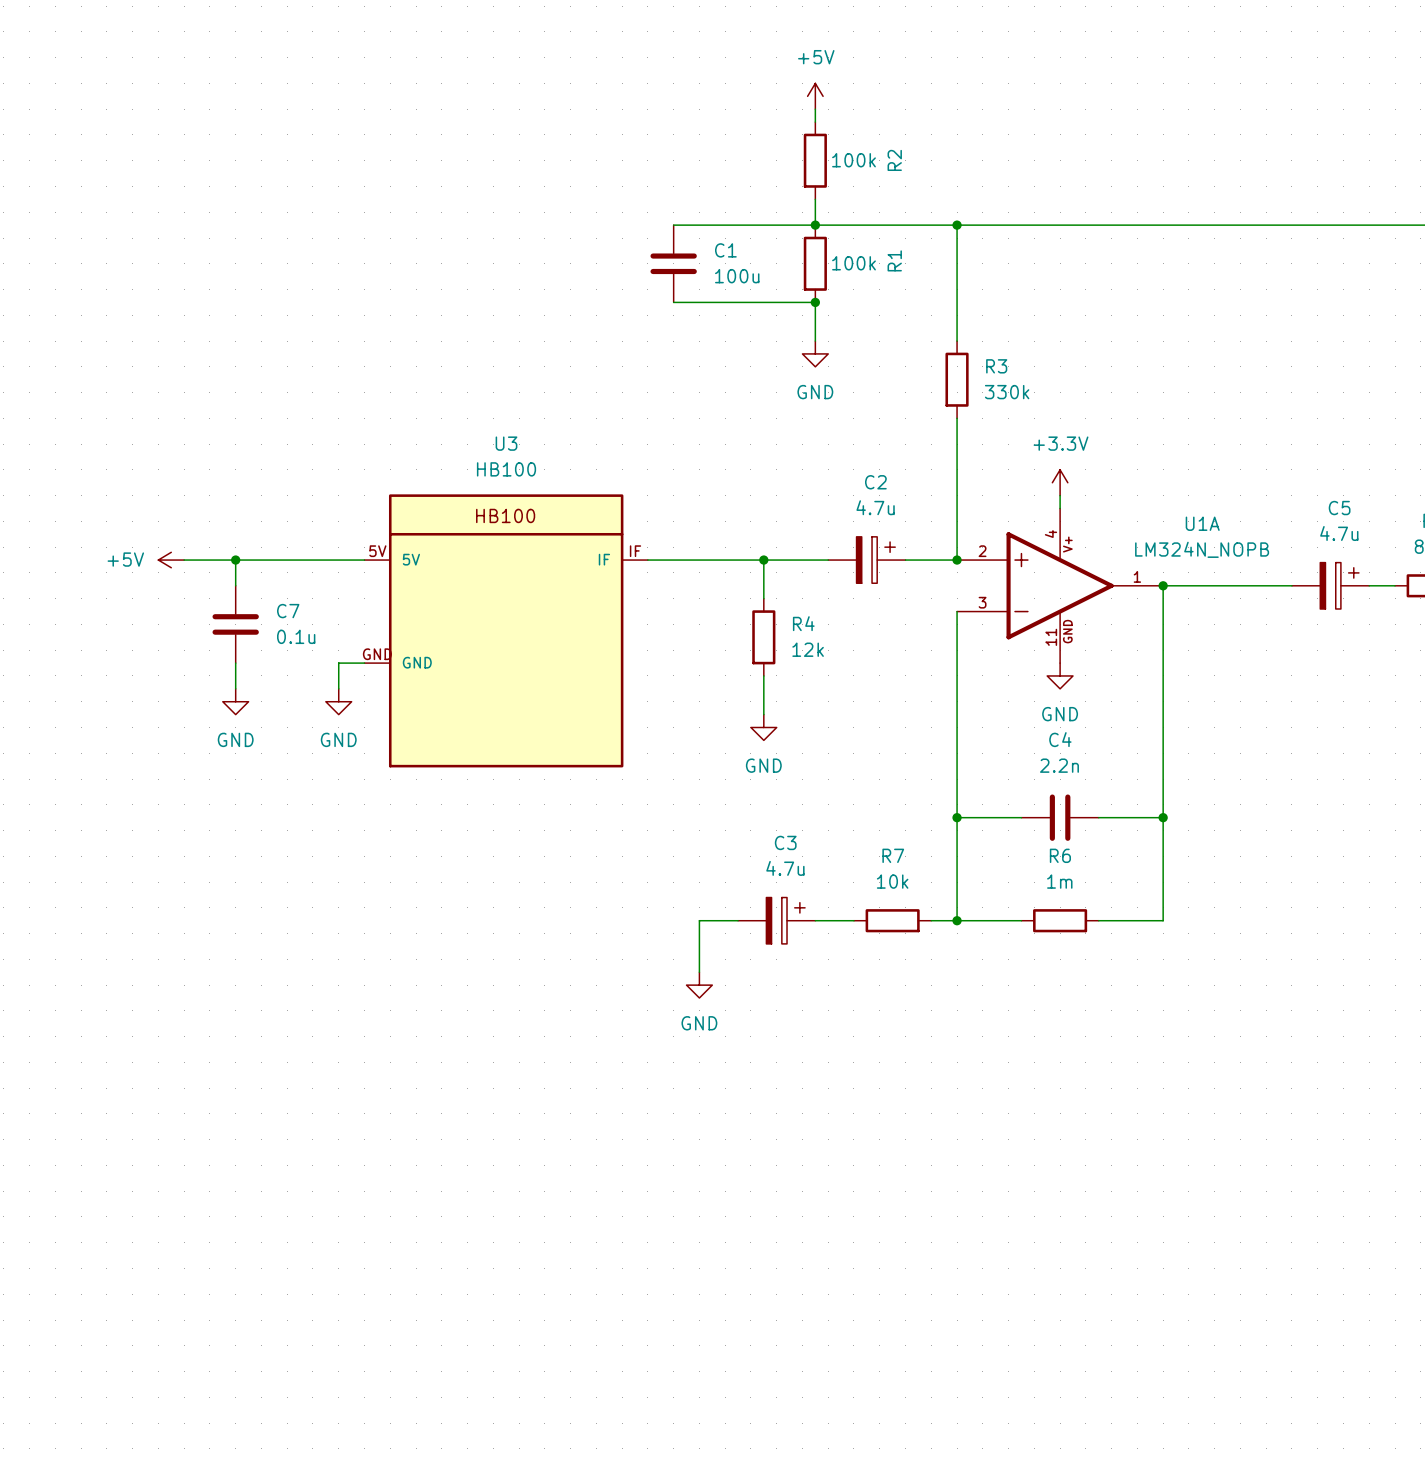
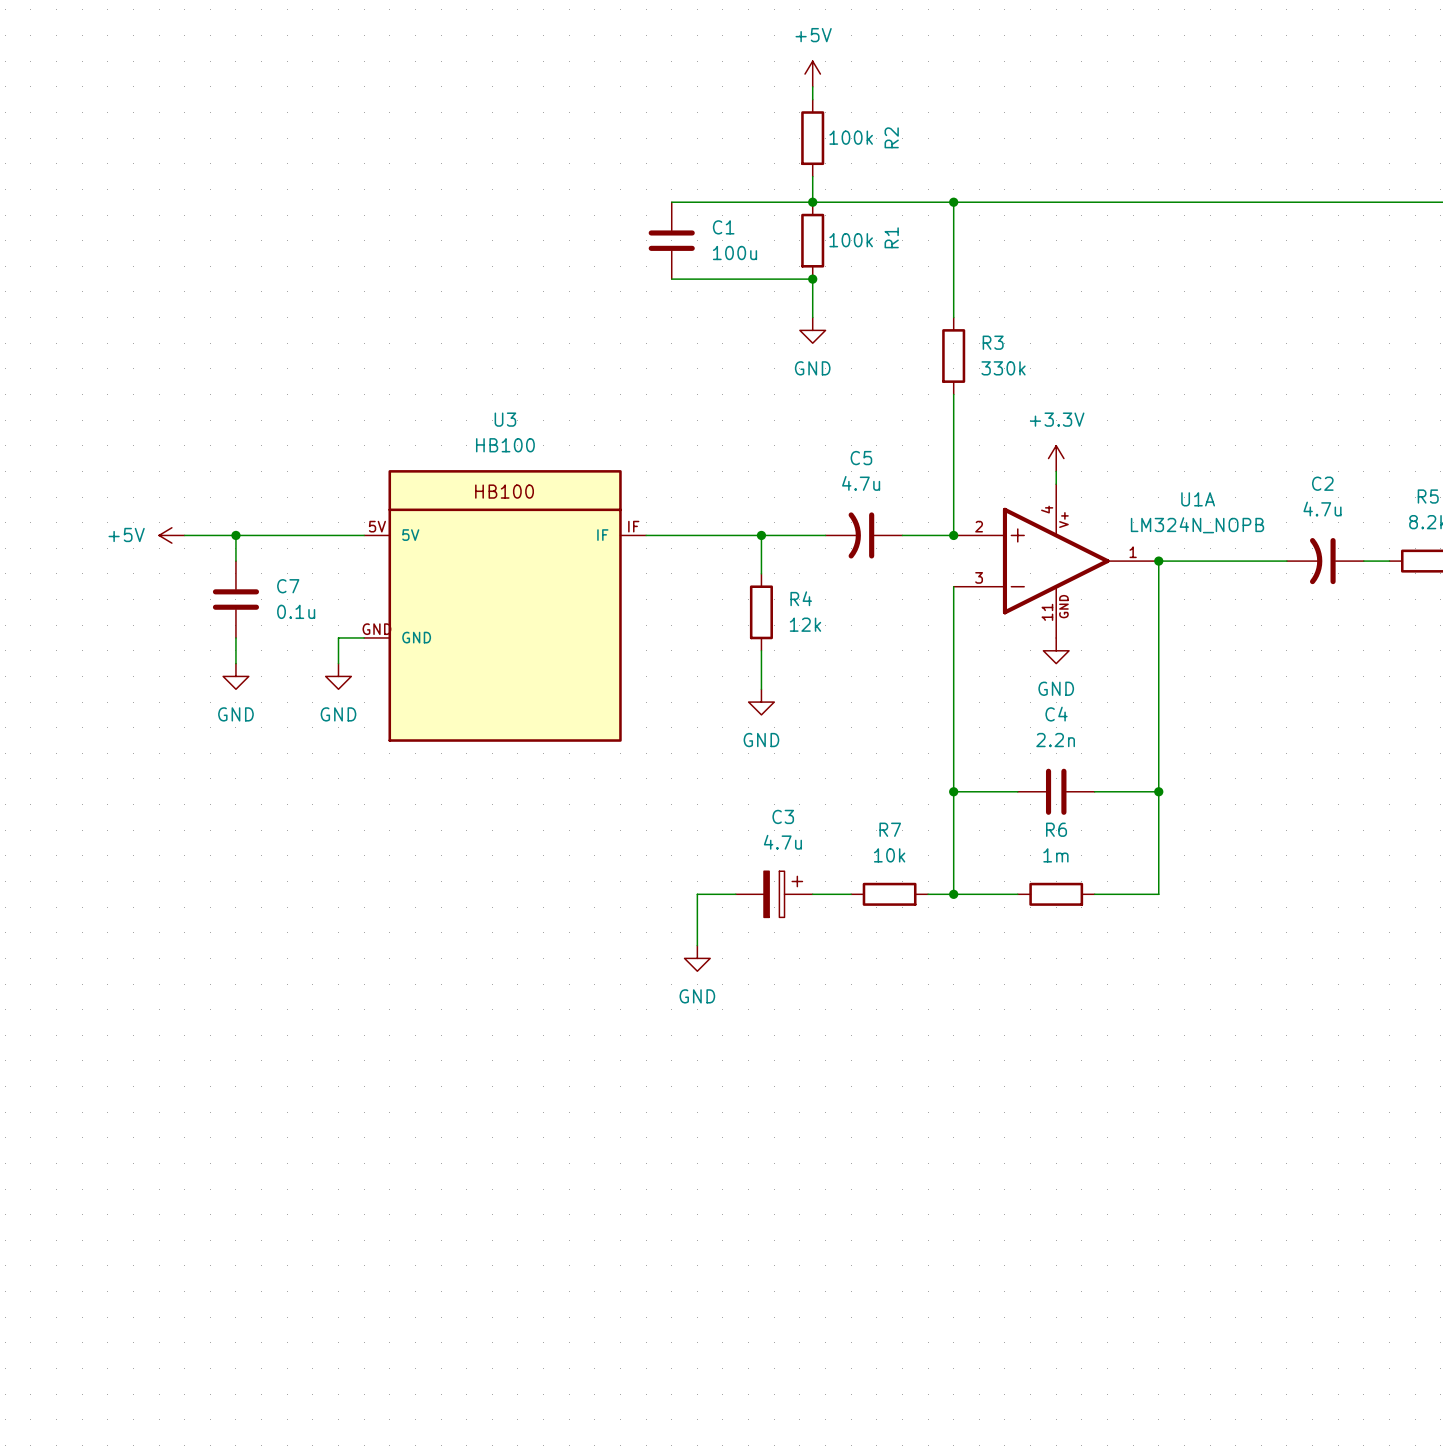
C2 symbol: [828, 536, 906, 584] -> [1286, 538, 1364, 585]
C5 symbol: [1291, 562, 1370, 609] -> [825, 512, 903, 559]

